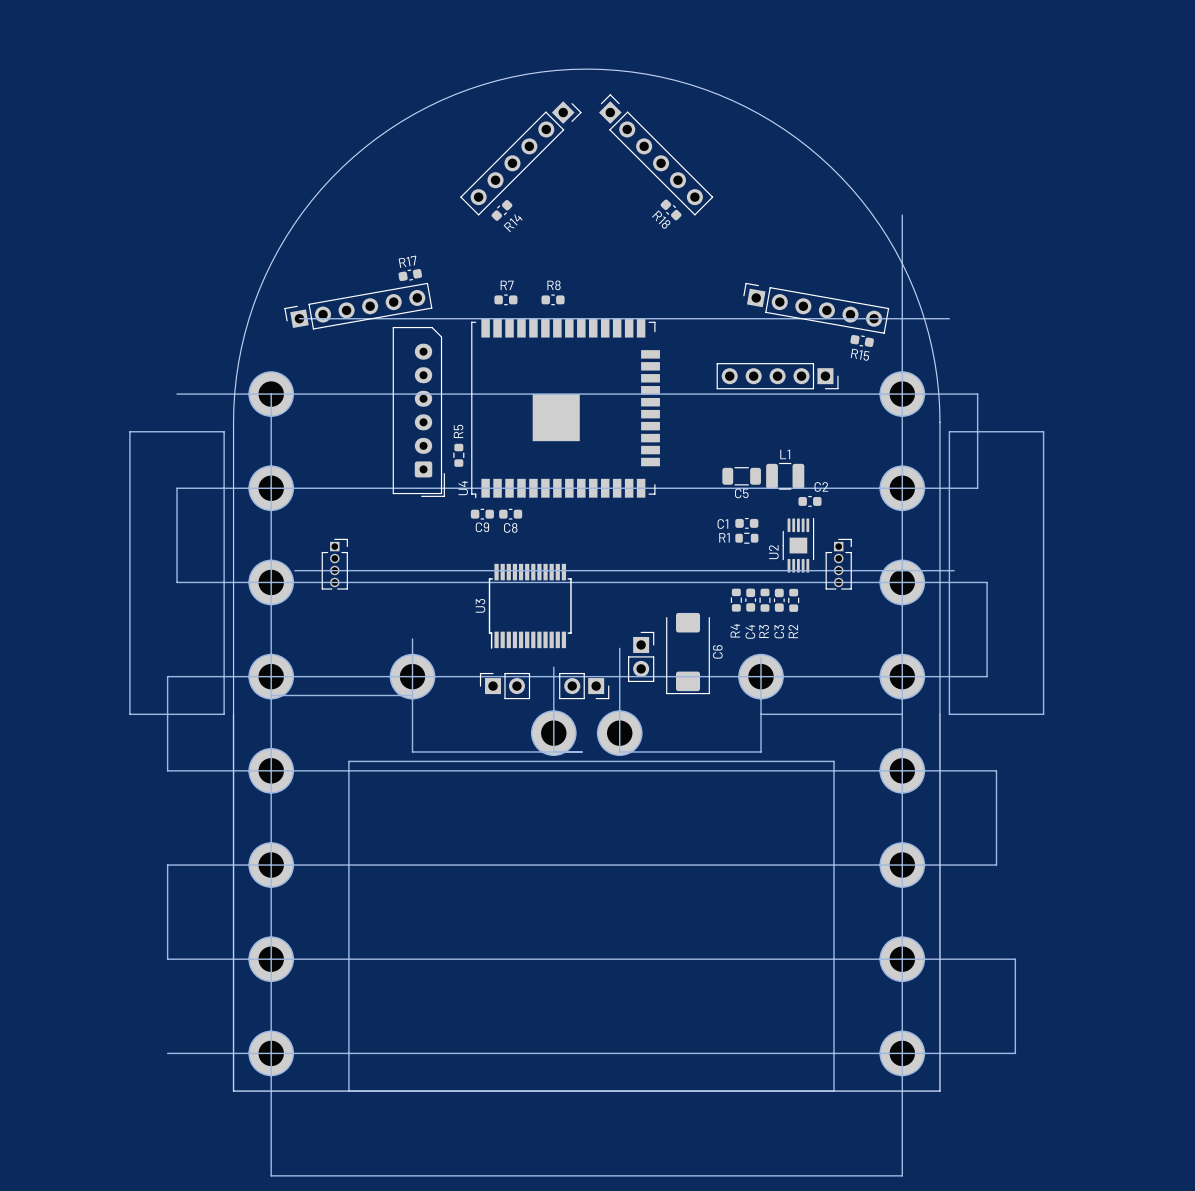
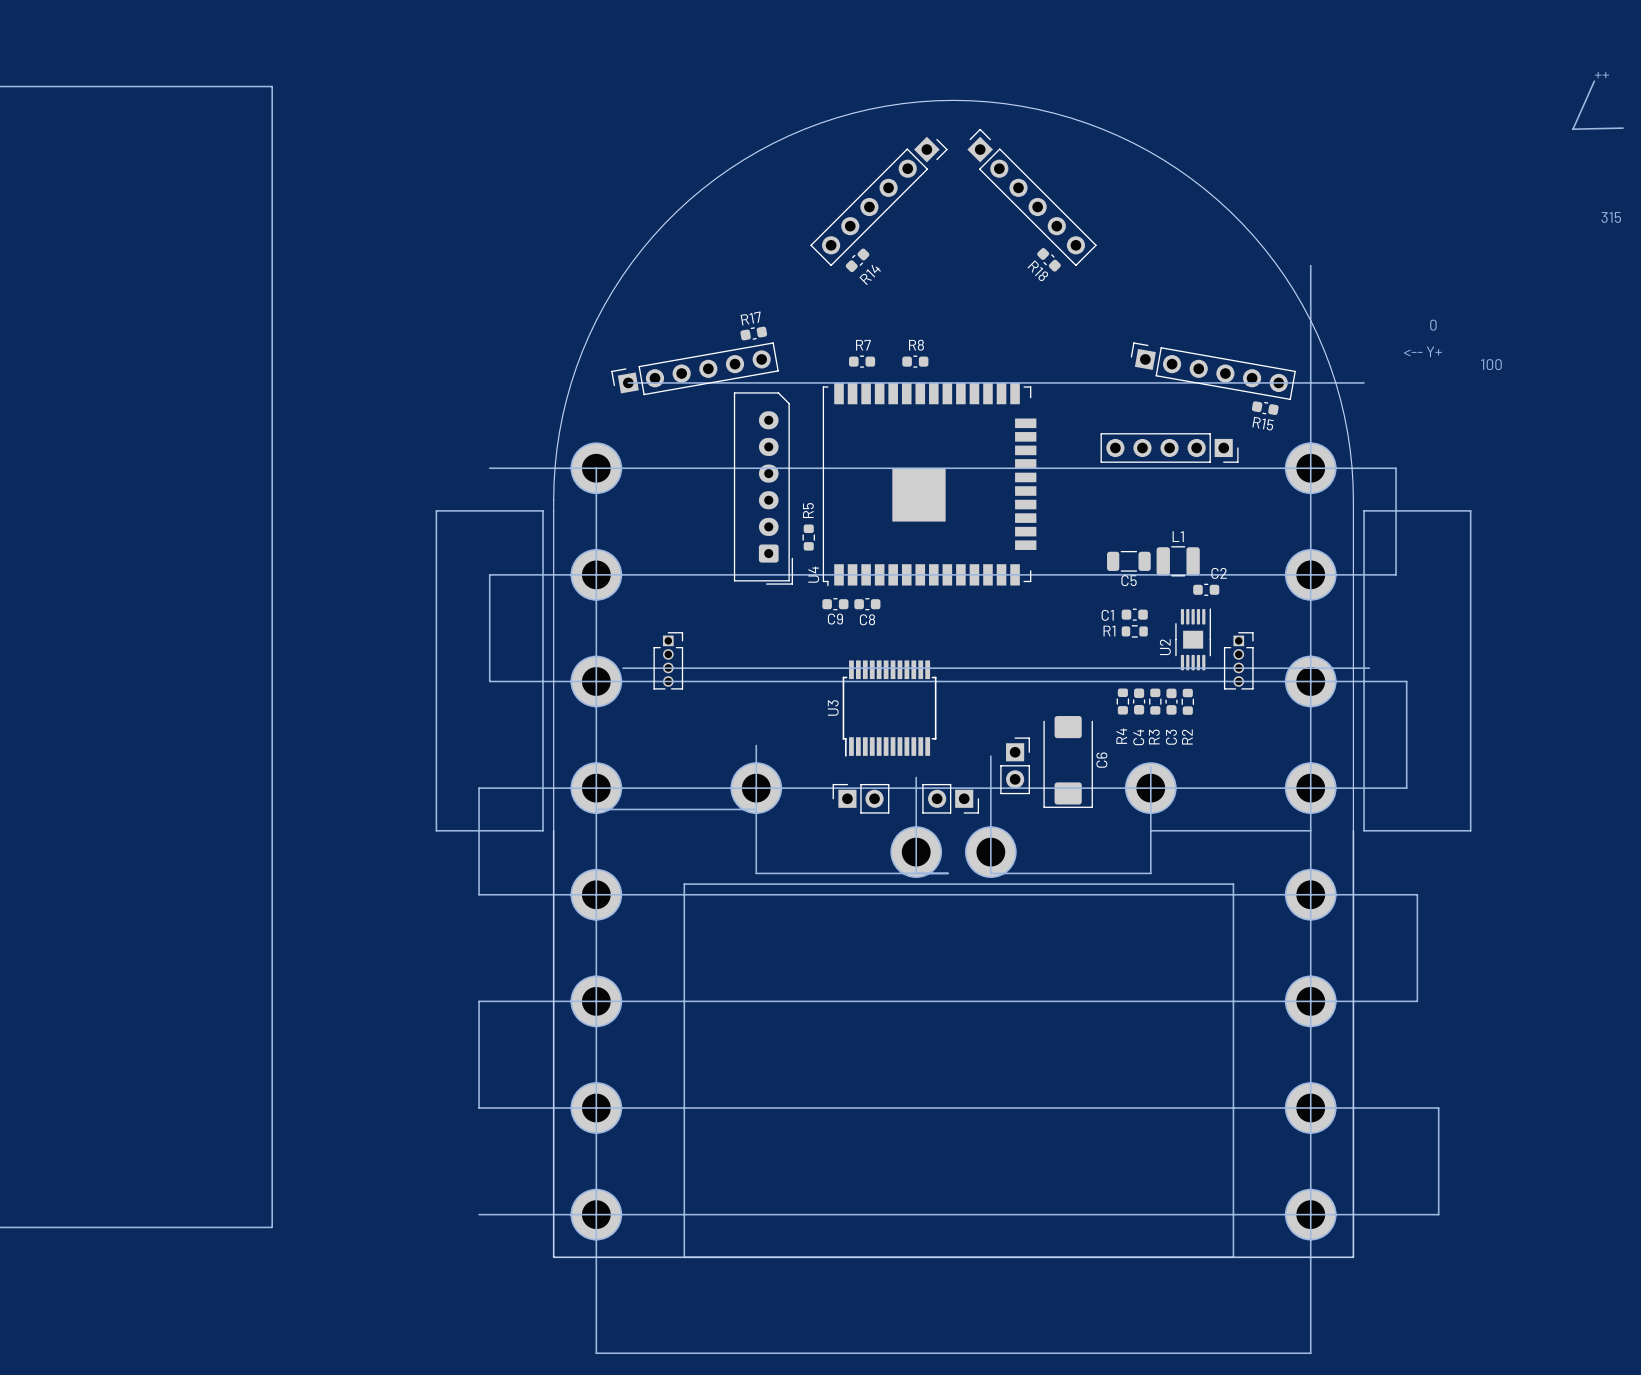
text: none -> ++ (1601, 75)
line: none -> (1594, 81) (1573, 129) (1623, 128)
text: none -> 315 (1611, 217)
text: none -> 0 (1433, 325)
text: none -> <-- Y+ (1422, 351)
text: none -> 100 (1491, 364)

